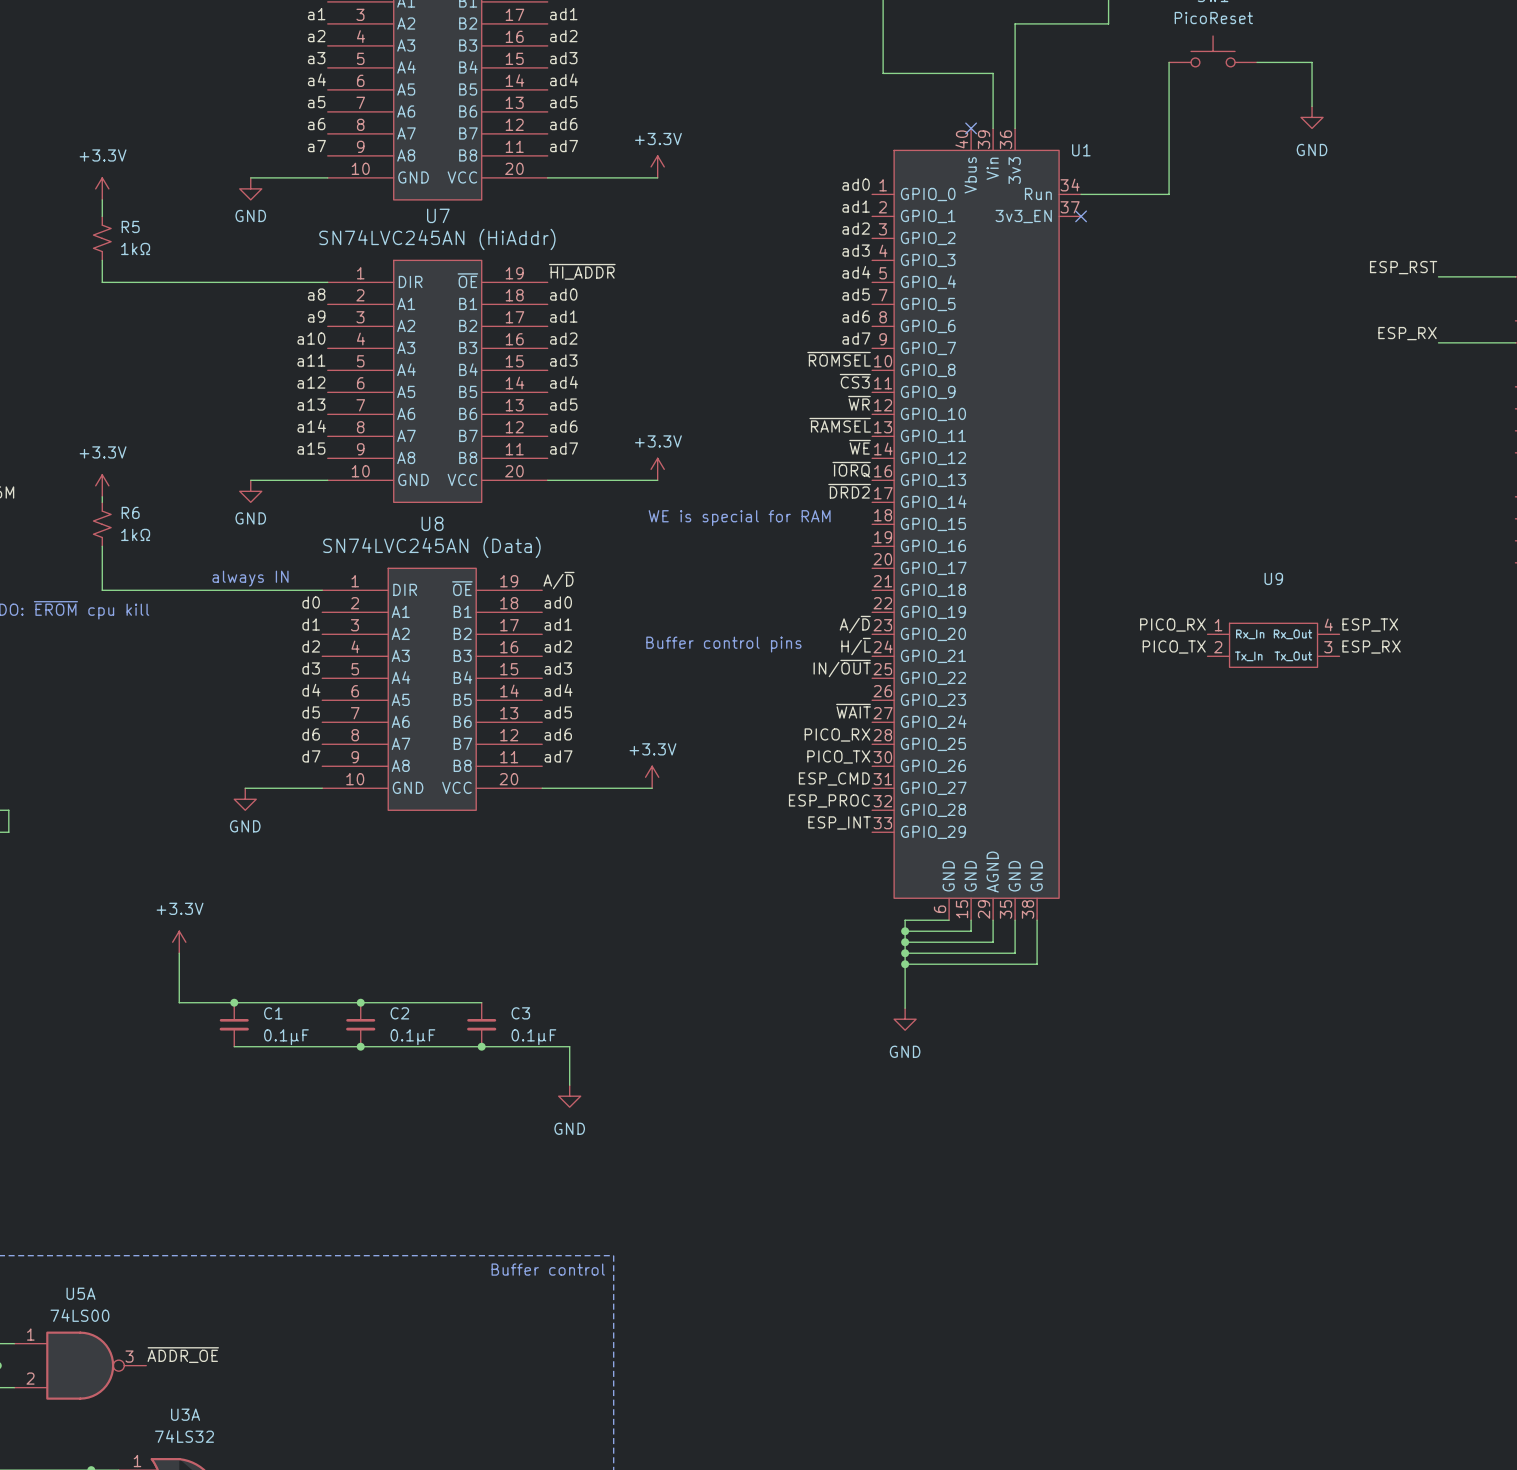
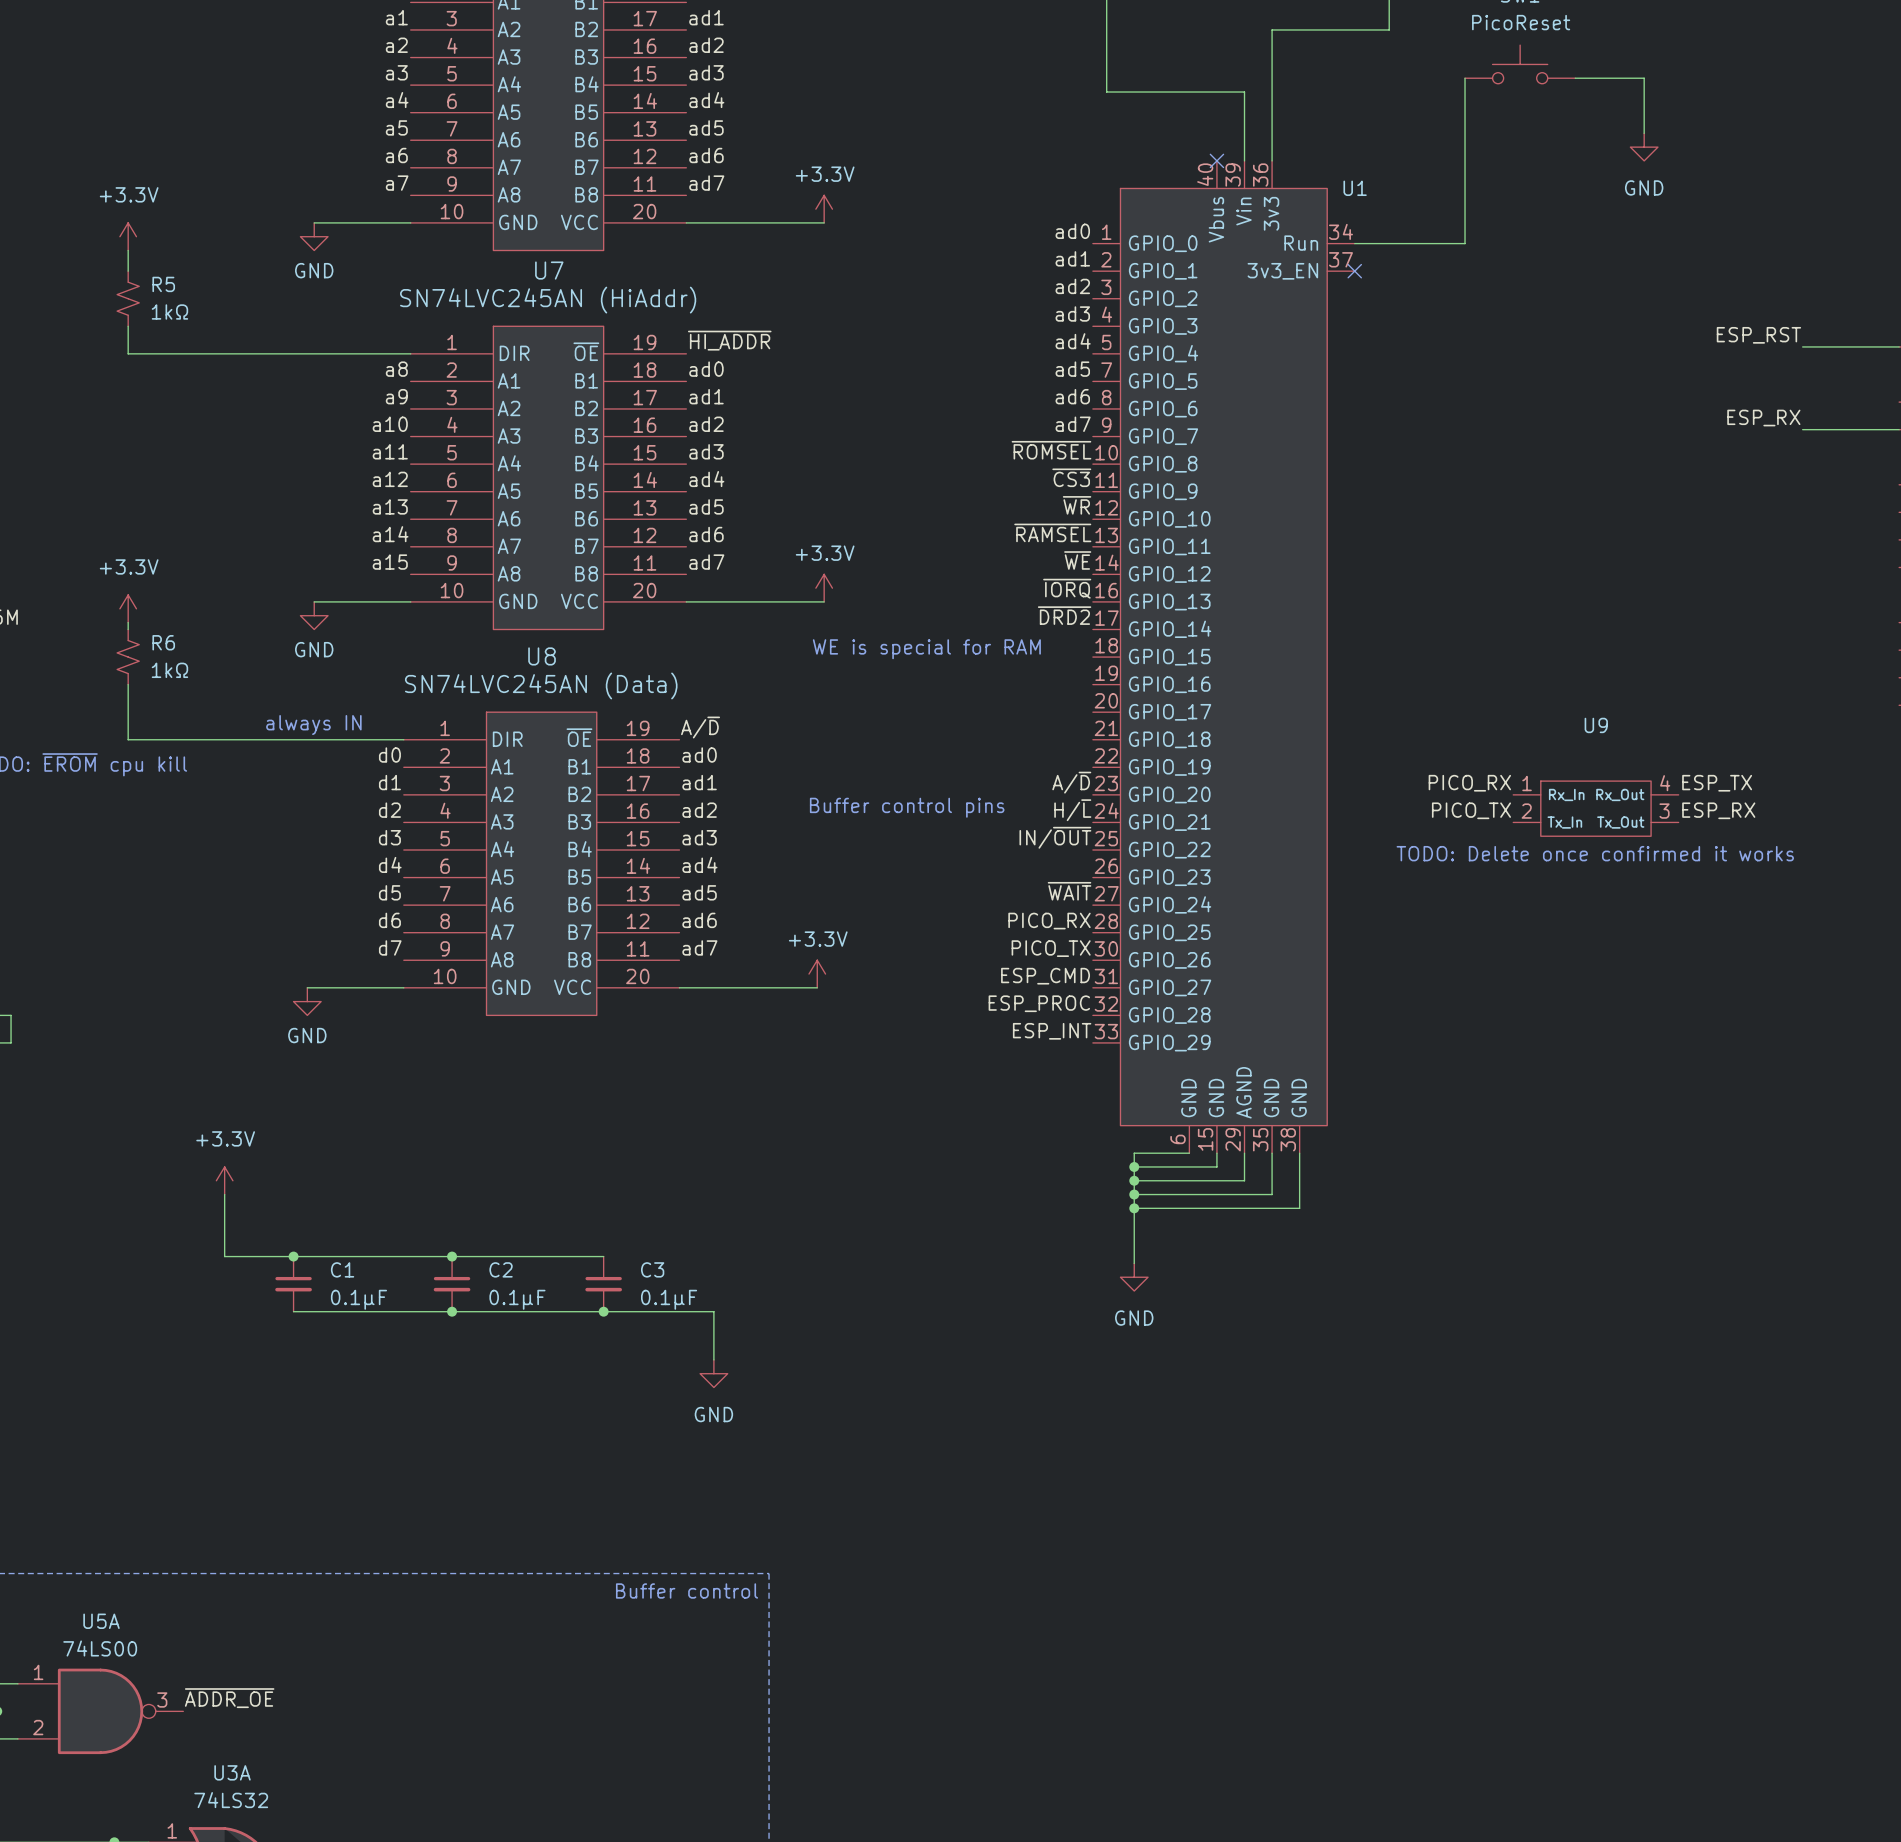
text: none -> TODO: Delete once confirmed it works (1595, 853)

